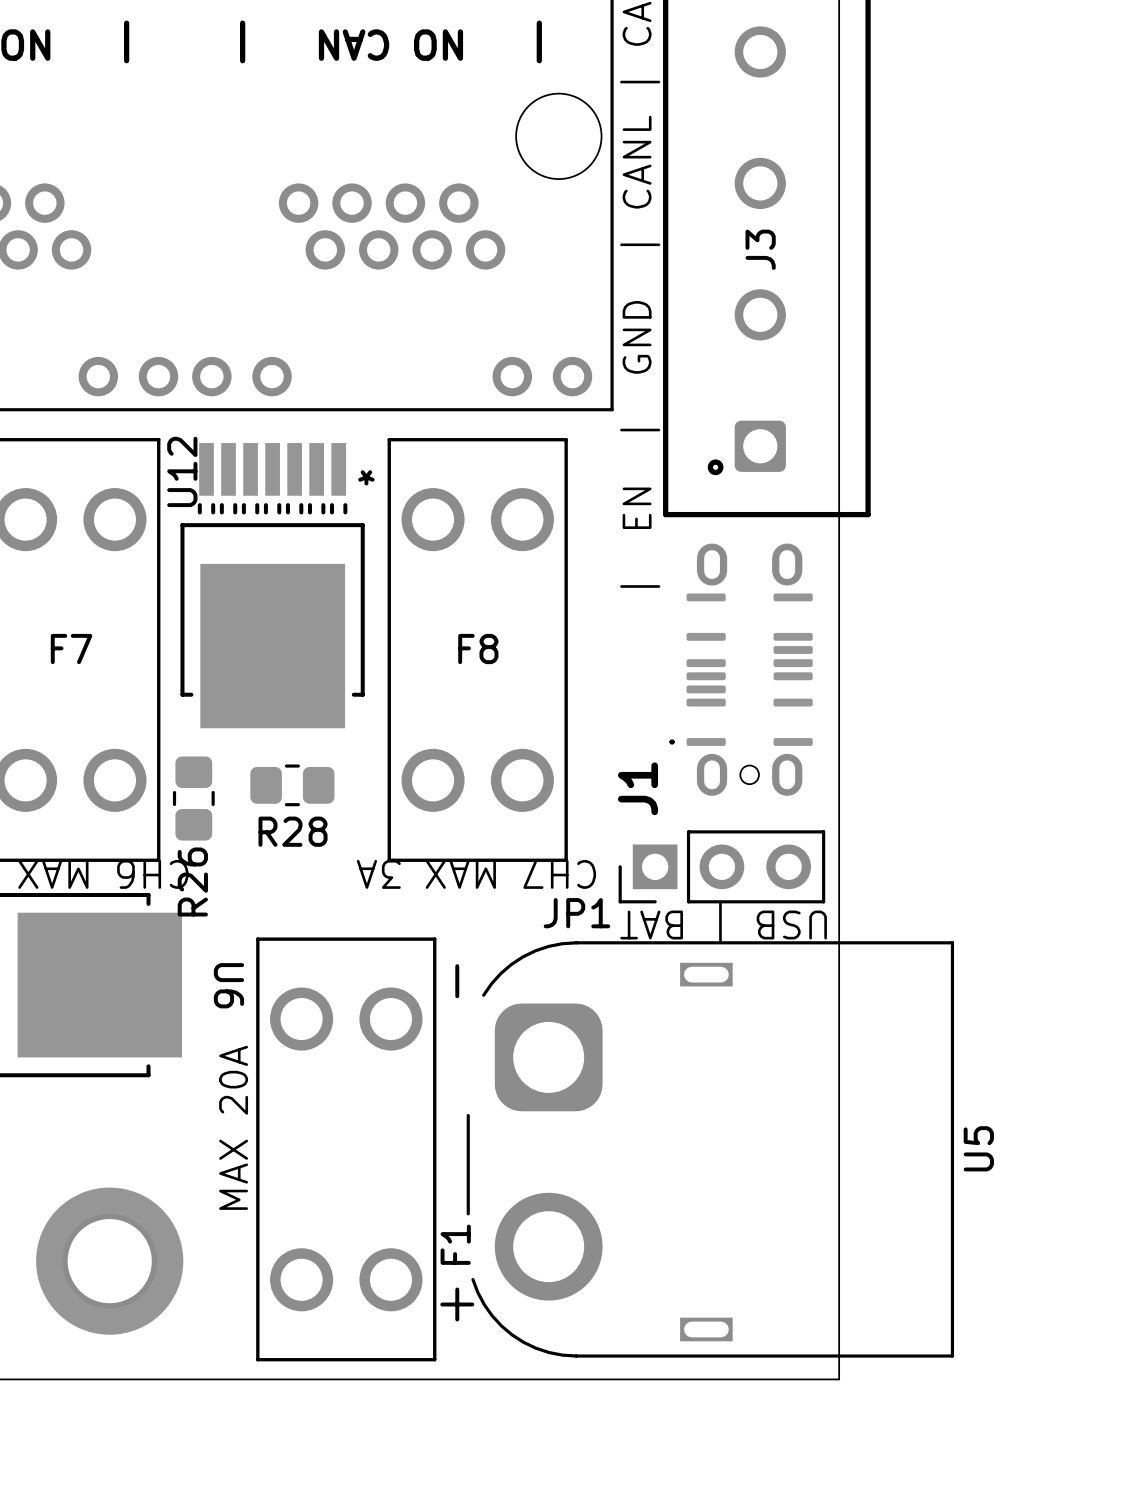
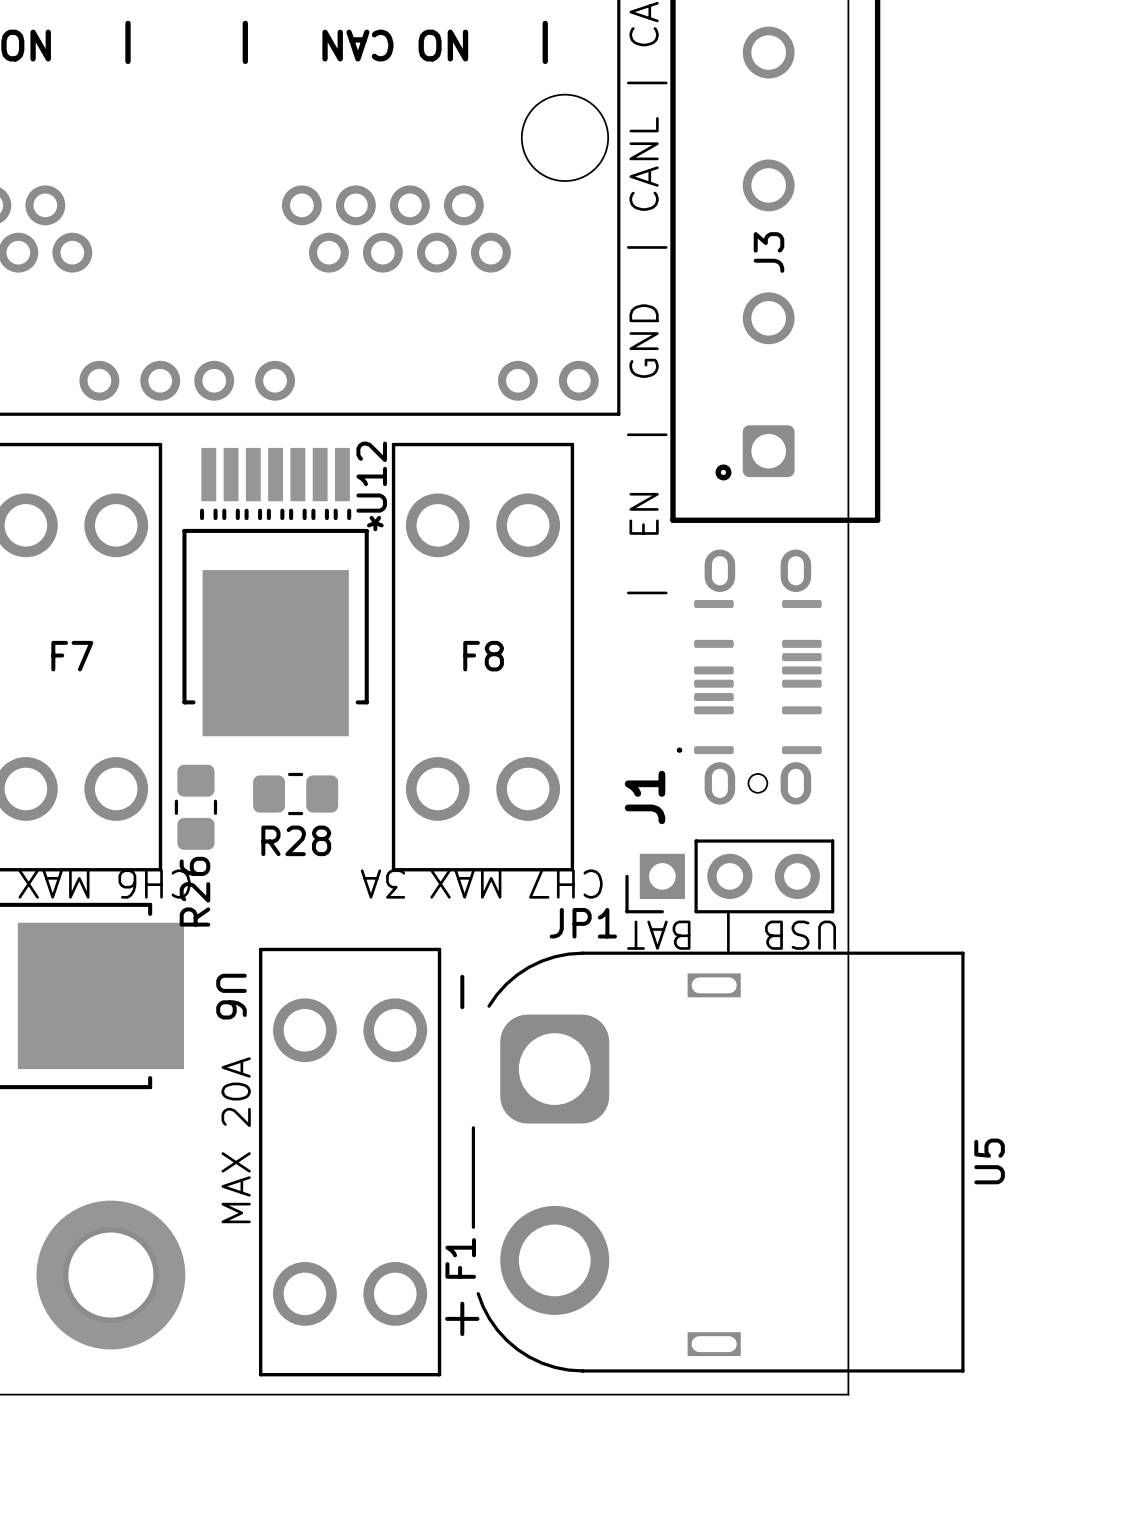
U12 name position: U12 (182, 471) -> U12 (371, 477)
U12 text position: * (366, 477) -> * (375, 523)

